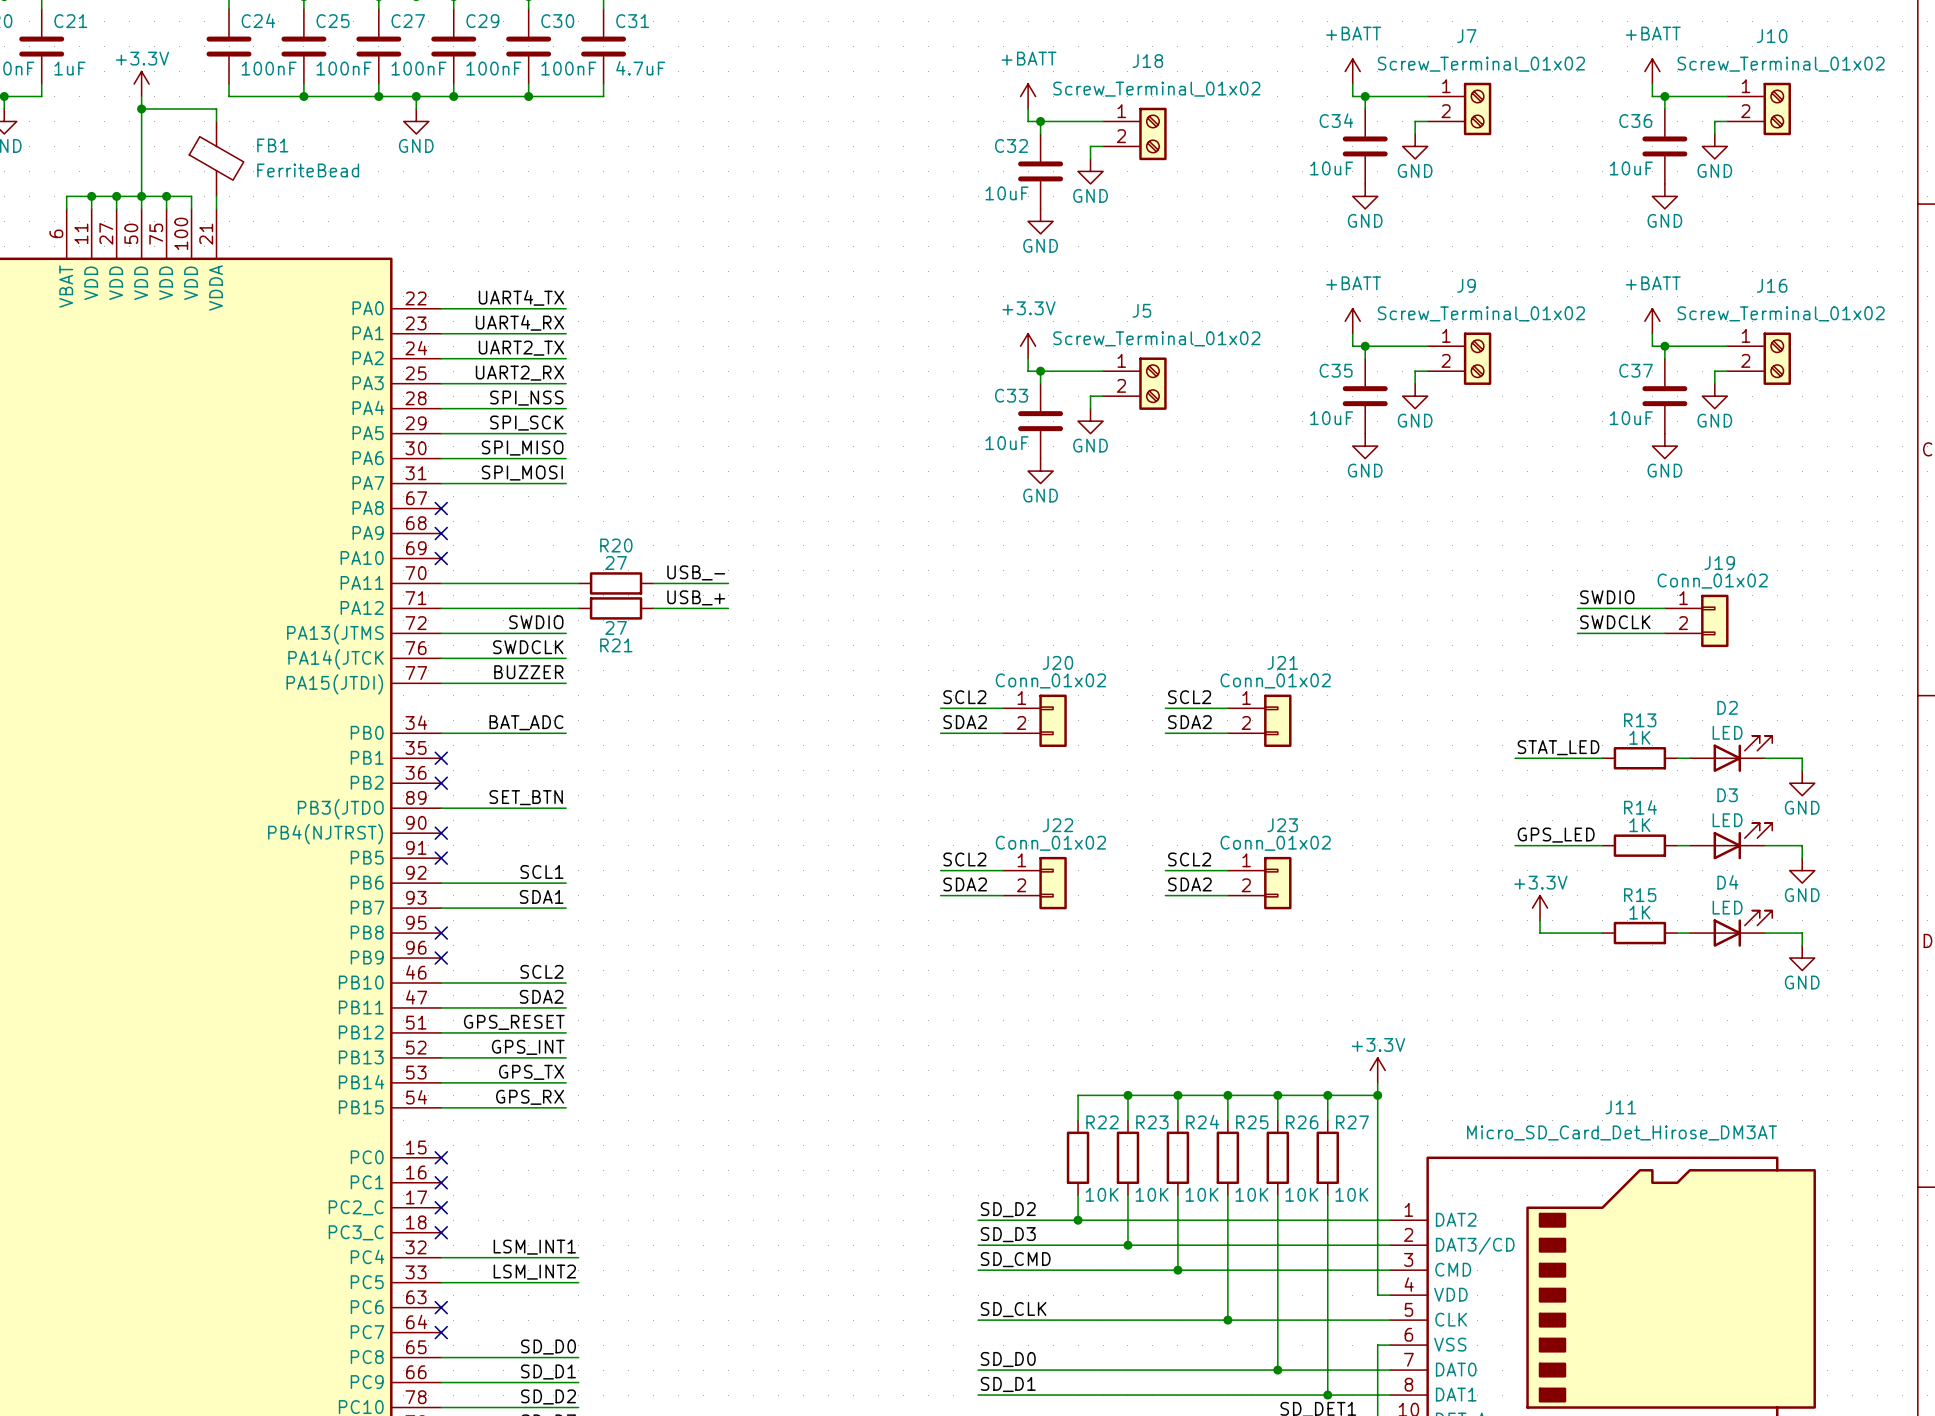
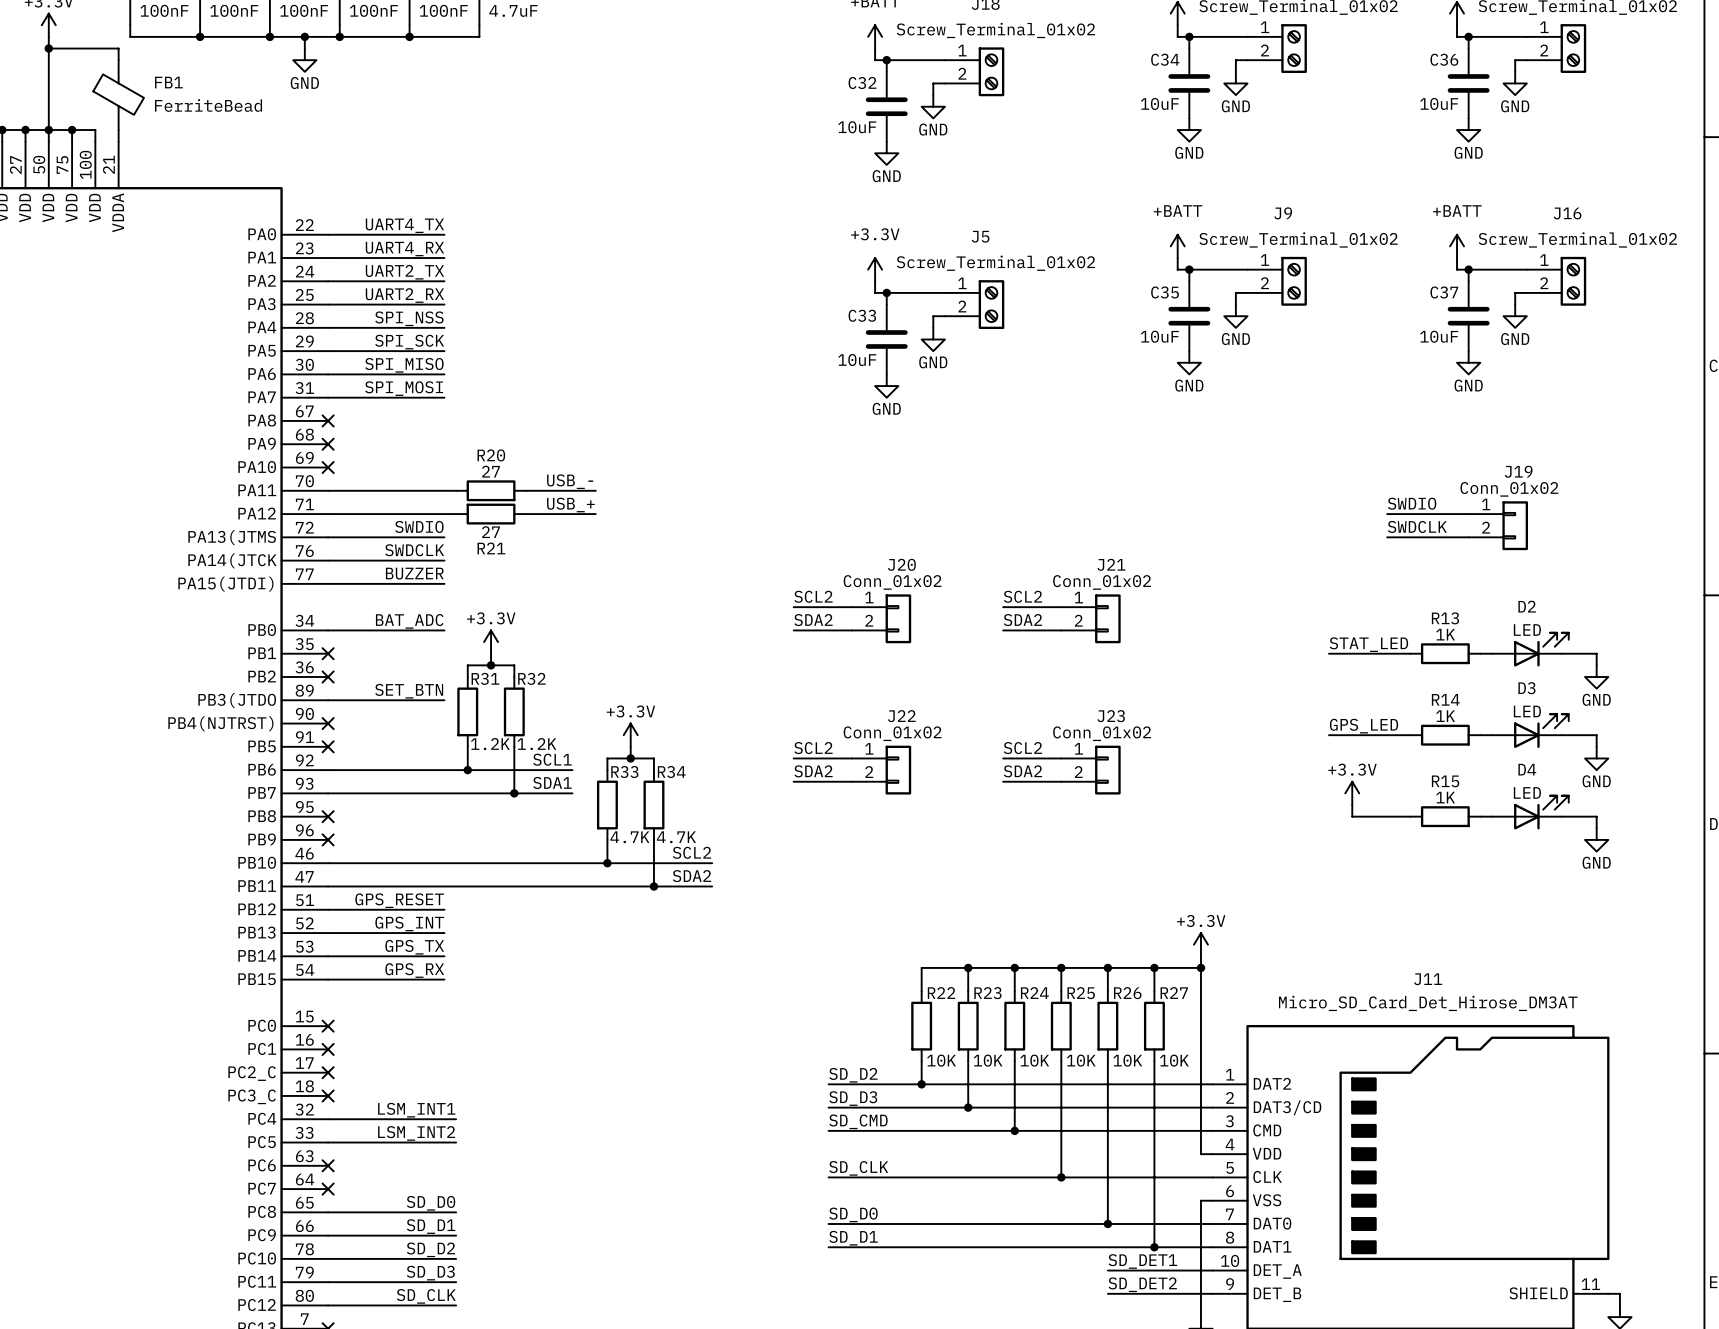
power symbol: none -> +3.3V (491, 642)
wire: none -> (491, 653) (491, 665)
junction: none -> (491, 665)
wire: none -> (467, 677) (467, 665) (514, 665) (514, 677)
R31: none -> 1.2K (467, 711)
R32: none -> 1.2K (514, 711)
power symbol: none -> +3.3V (630, 735)
wire: none -> (467, 746) (467, 770)
wire: none -> (514, 746) (514, 793)
wire: none -> (630, 746) (630, 758)
junction: none -> (630, 758)
label position: SCL1 (541, 871) -> SCL1 (552, 759)
wire: none -> (444, 770) (572, 770)
junction: none -> (467, 770)
wire: none -> (607, 770) (607, 758) (653, 758) (653, 770)
label position: SDA1 (541, 896) -> SDA1 (552, 782)
wire: none -> (444, 793) (572, 793)
junction: none -> (514, 793)
R33: none -> 4.7K (607, 805)
R34: none -> 4.7K (653, 805)
wire: none -> (607, 839) (607, 863)
wire: none -> (653, 839) (653, 886)
label: SCL2 (541, 971) -> none
label: none -> SCL2 (692, 852)
wire: none -> (444, 863) (712, 863)
junction: none -> (607, 863)
label: SDA2 (541, 996) -> none
label: none -> SDA2 (692, 876)
wire: none -> (444, 886) (712, 886)
junction: none -> (653, 886)

